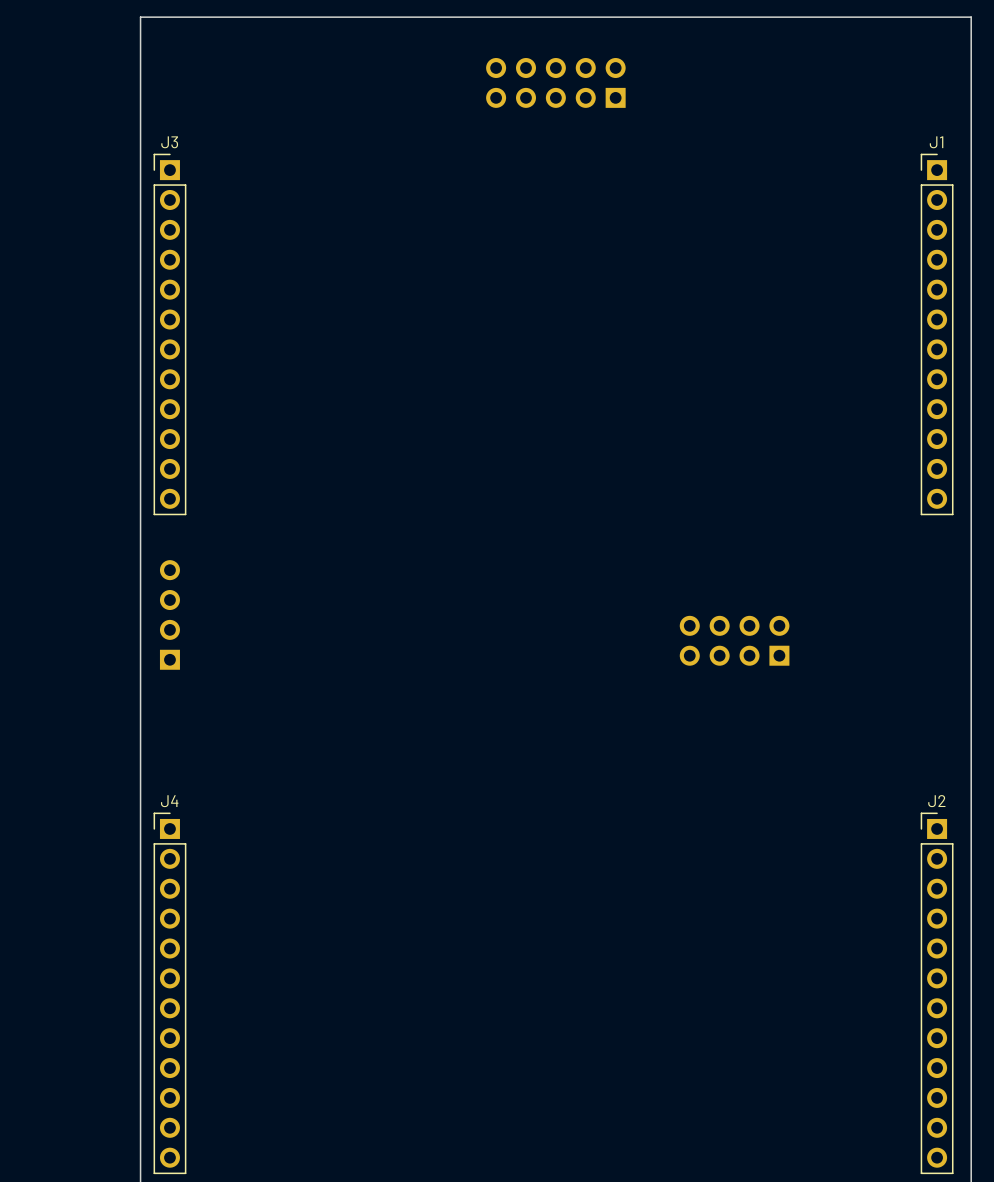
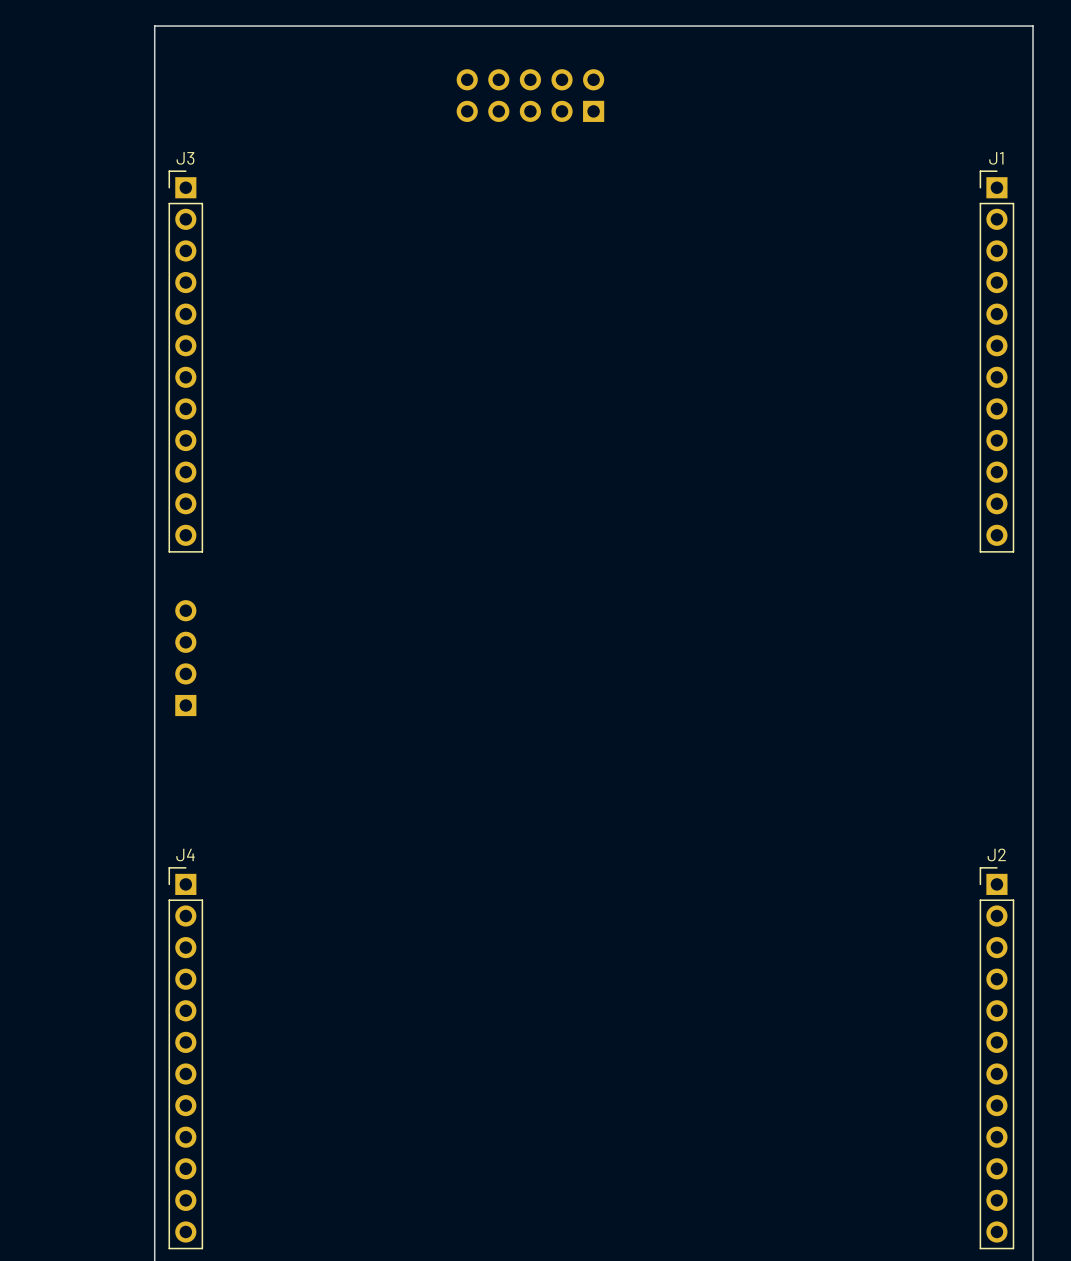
part position: (555, 82) -> (530, 95)
part: (734, 640) -> none

